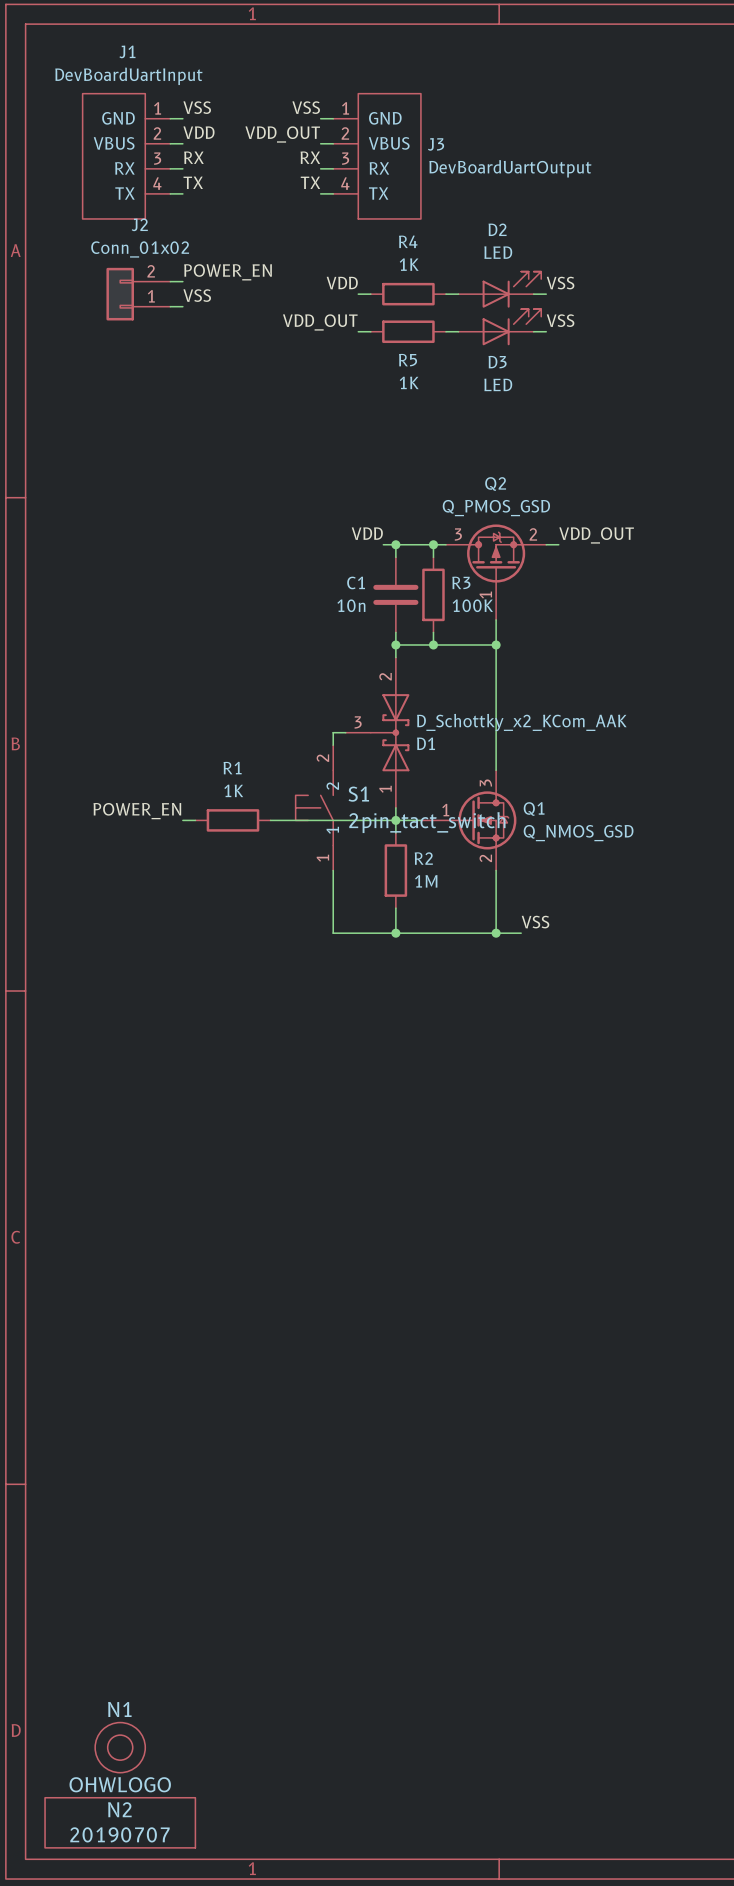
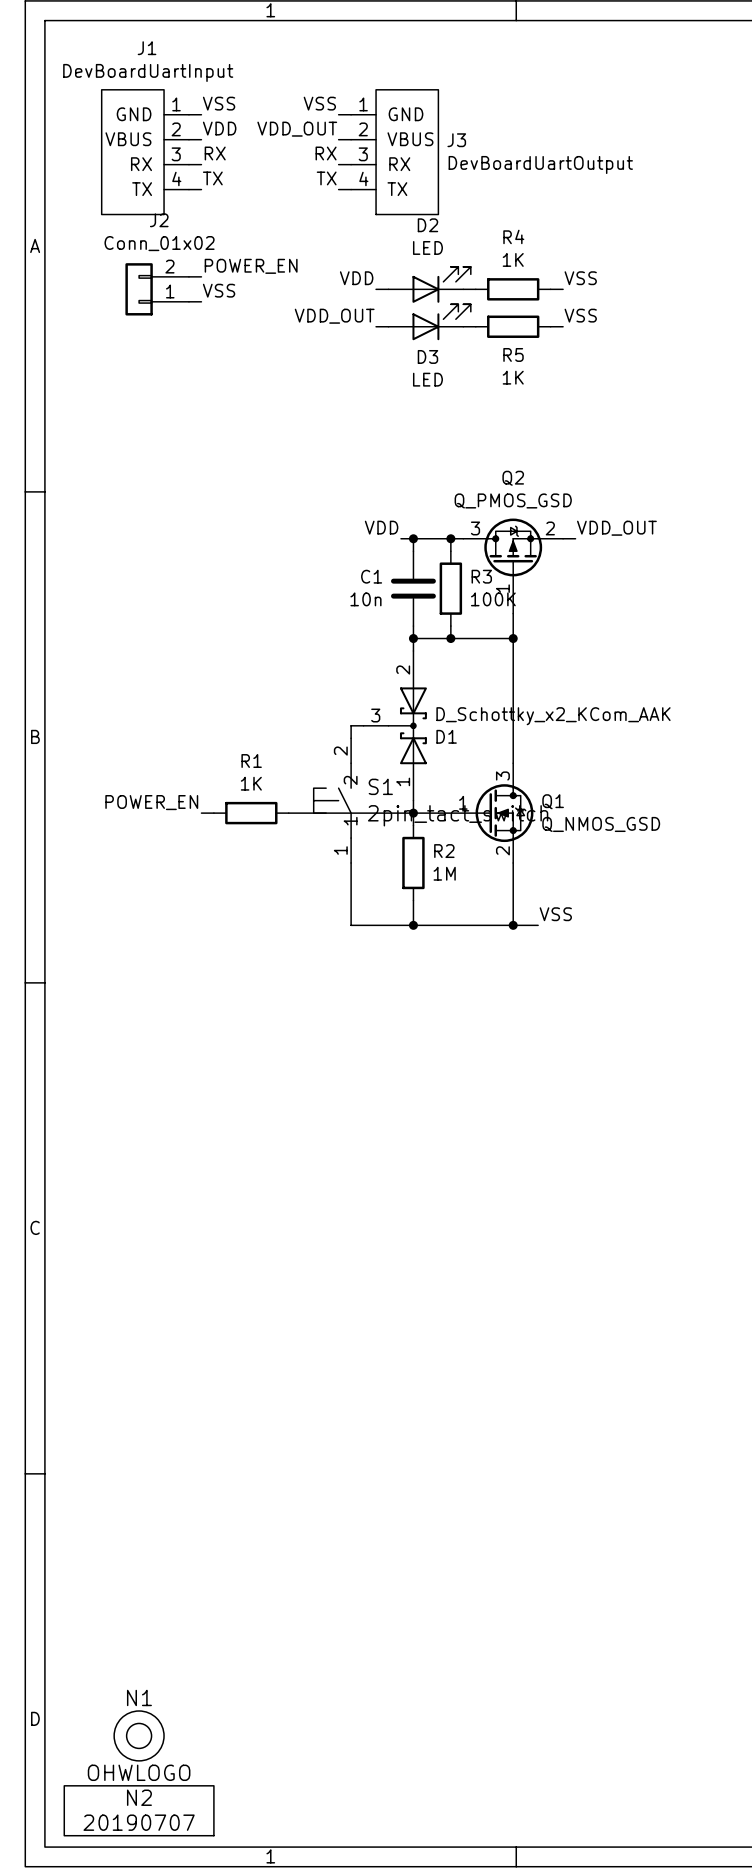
D2 position: (499, 289) -> (429, 284)
R4 position: (408, 294) -> (513, 289)
D3 position: (499, 327) -> (429, 322)
R5 position: (408, 331) -> (513, 326)

